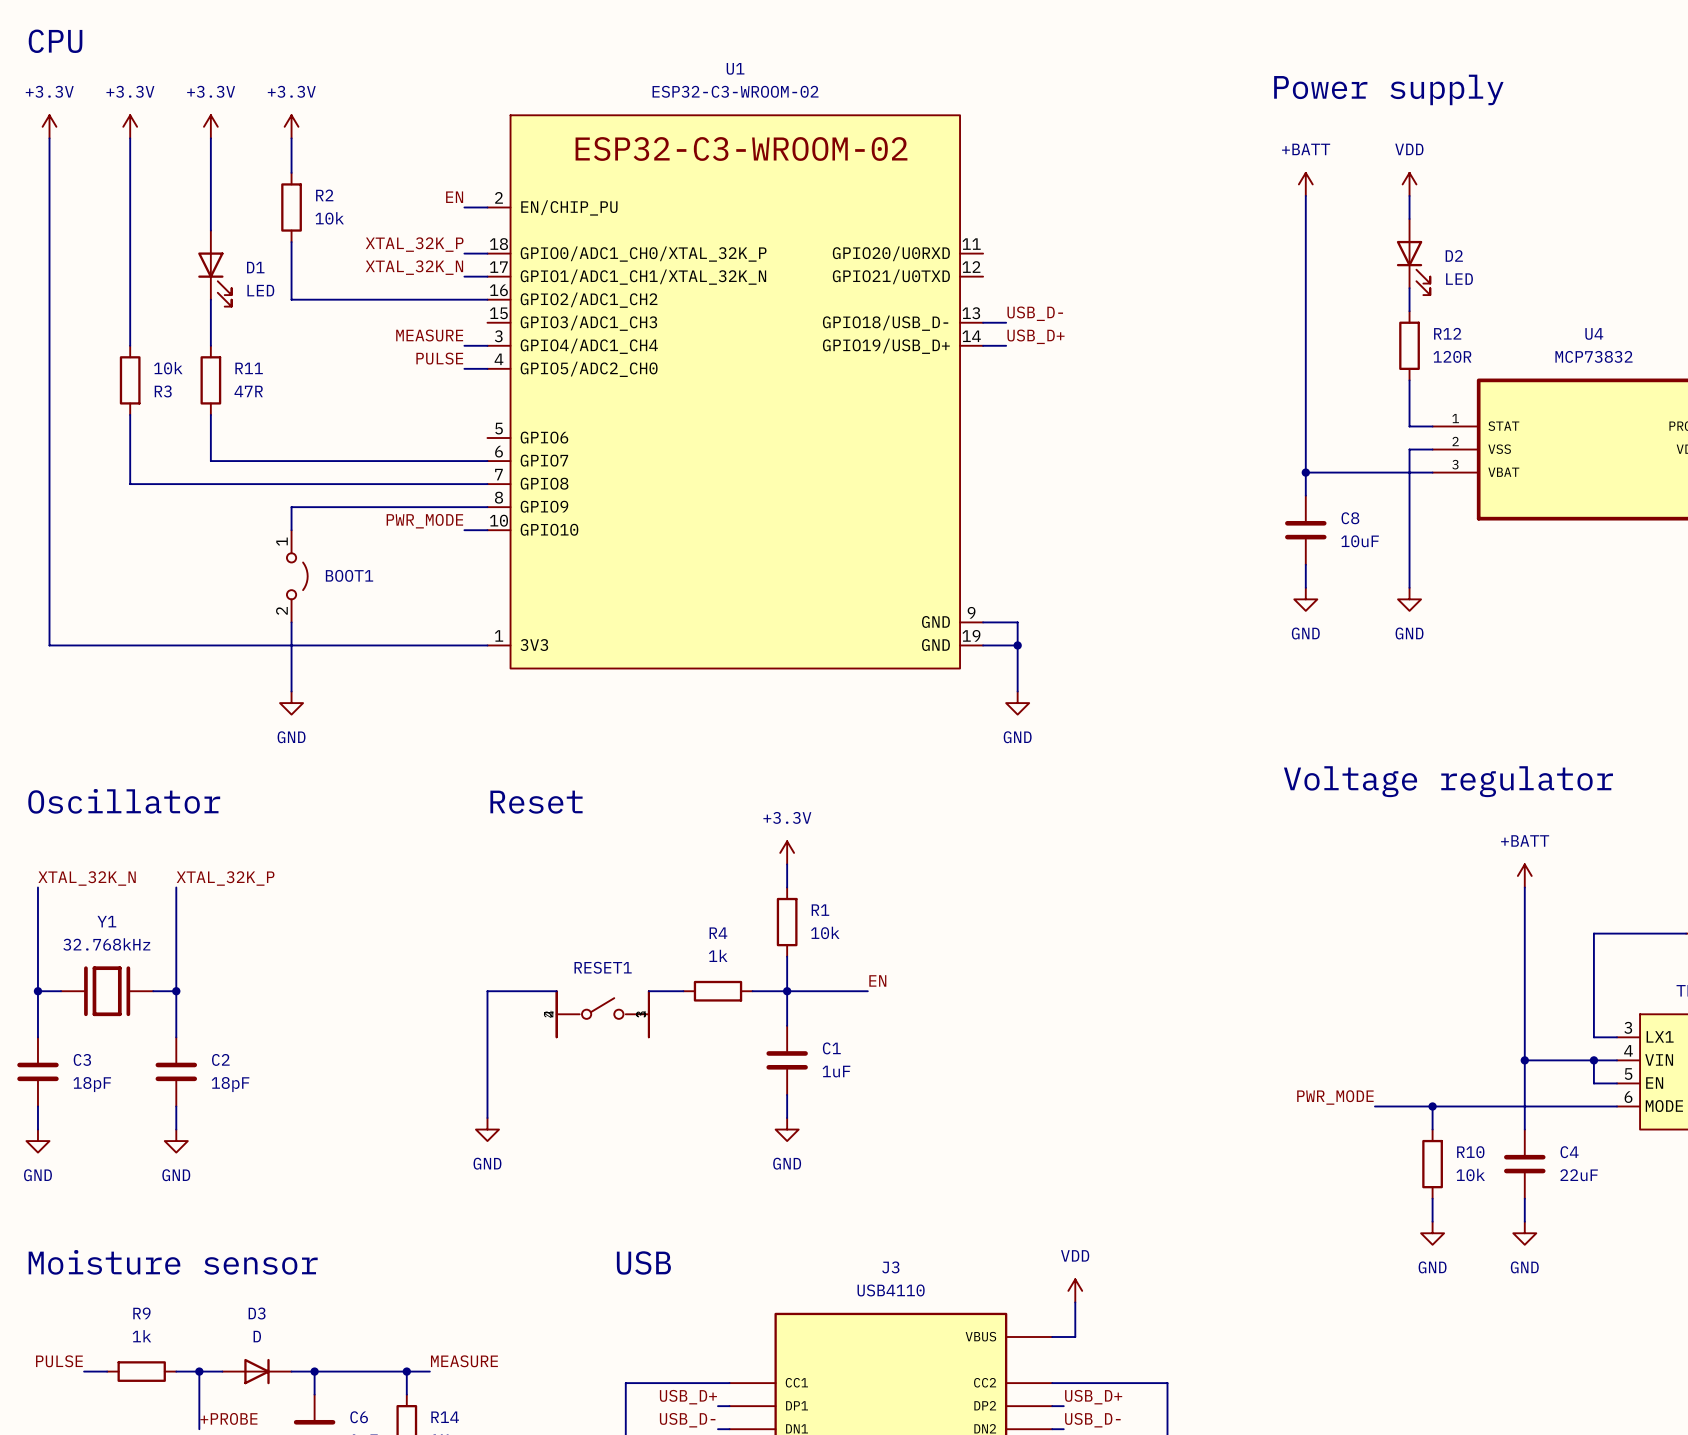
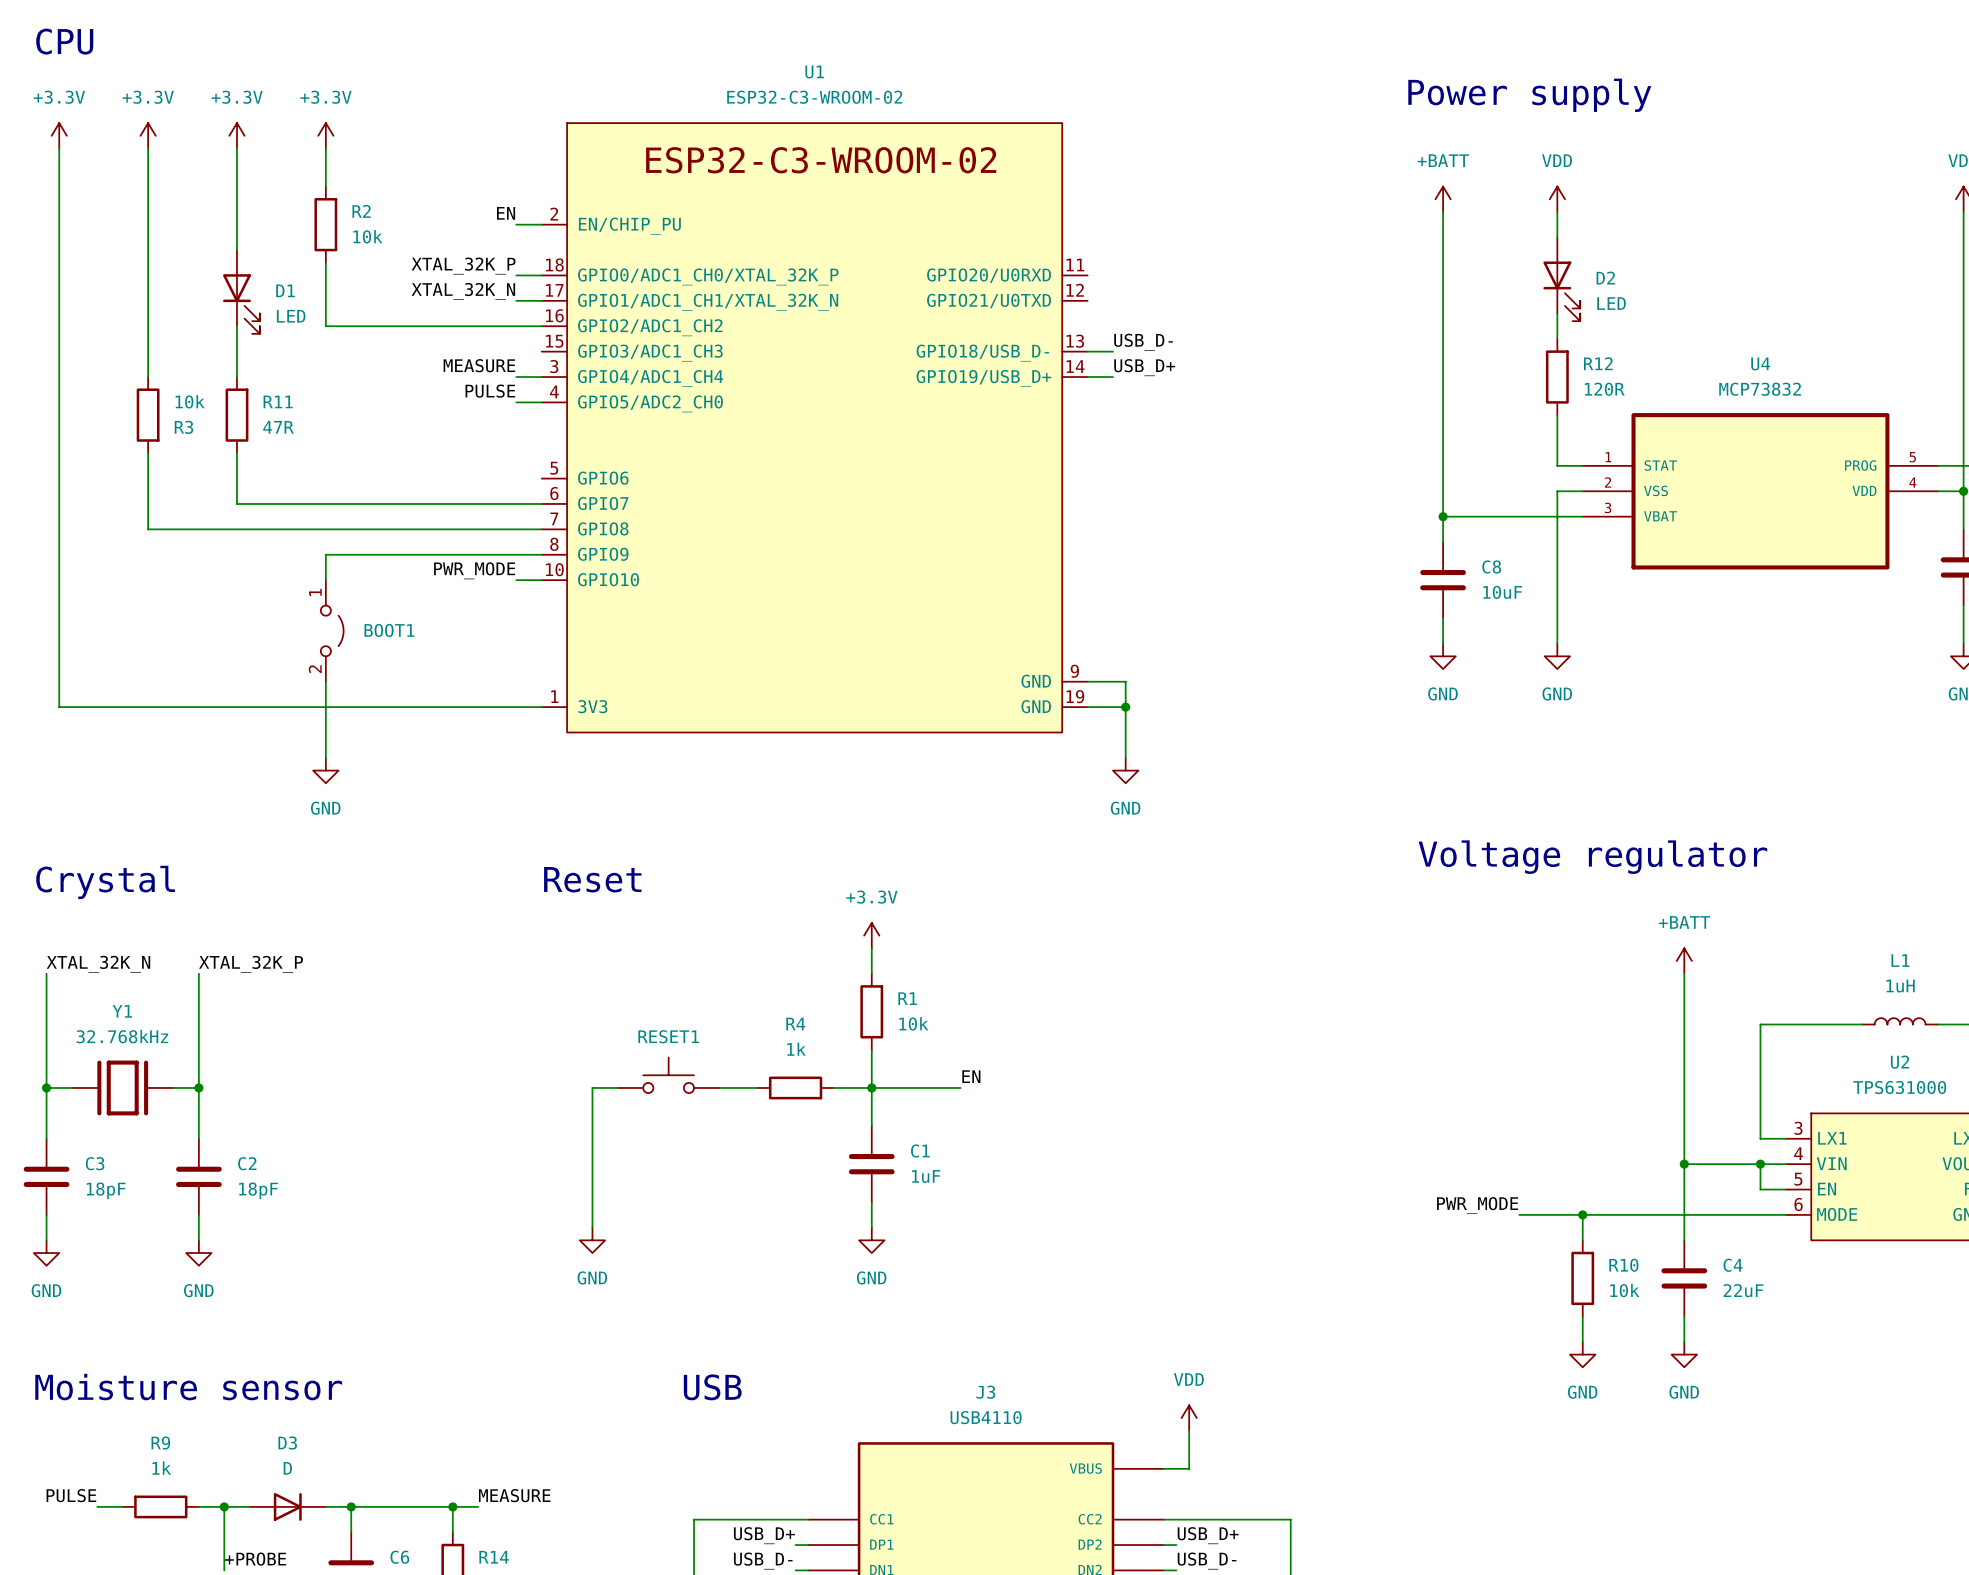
text: Oscillator (124, 801) -> Crystal (105, 882)
wire: (533, 991) (487, 991) (487, 1118) -> (592, 1087) (592, 1227)
RESET1 symbol: [556, 991, 649, 1038] -> [617, 1057, 720, 1094]
power symbol position: GND (487, 1129) -> GND (592, 1240)

